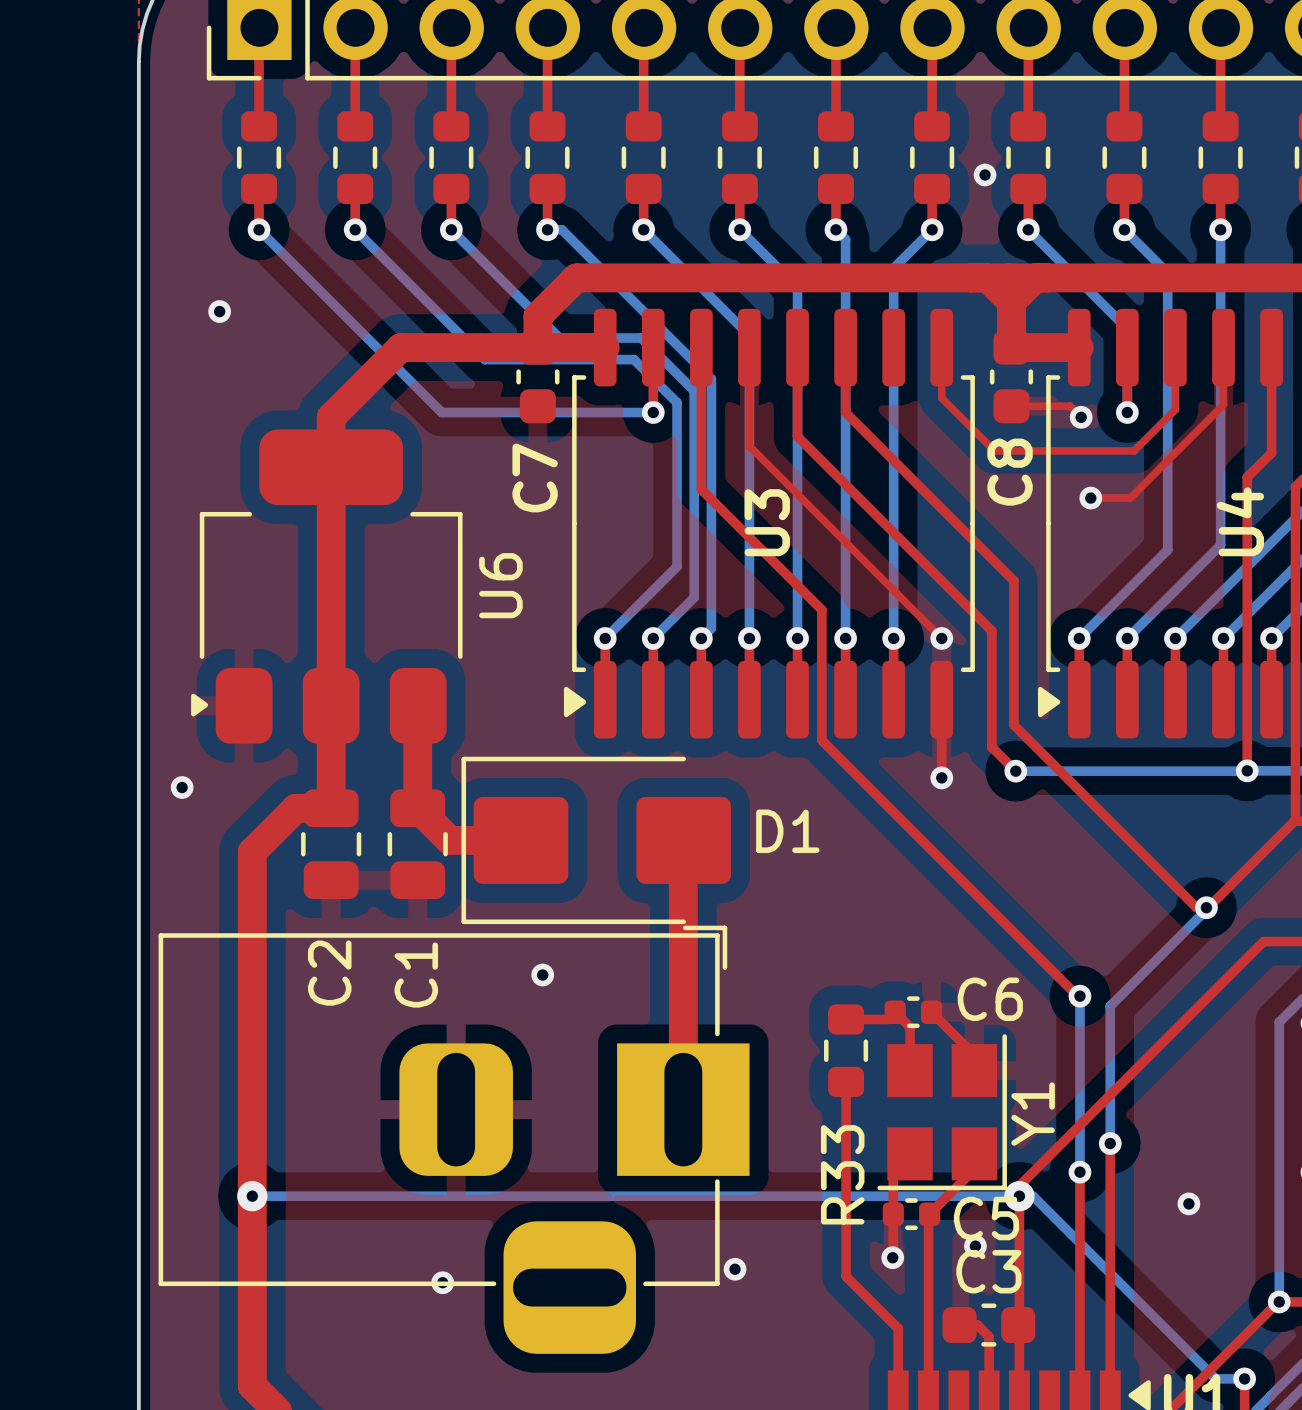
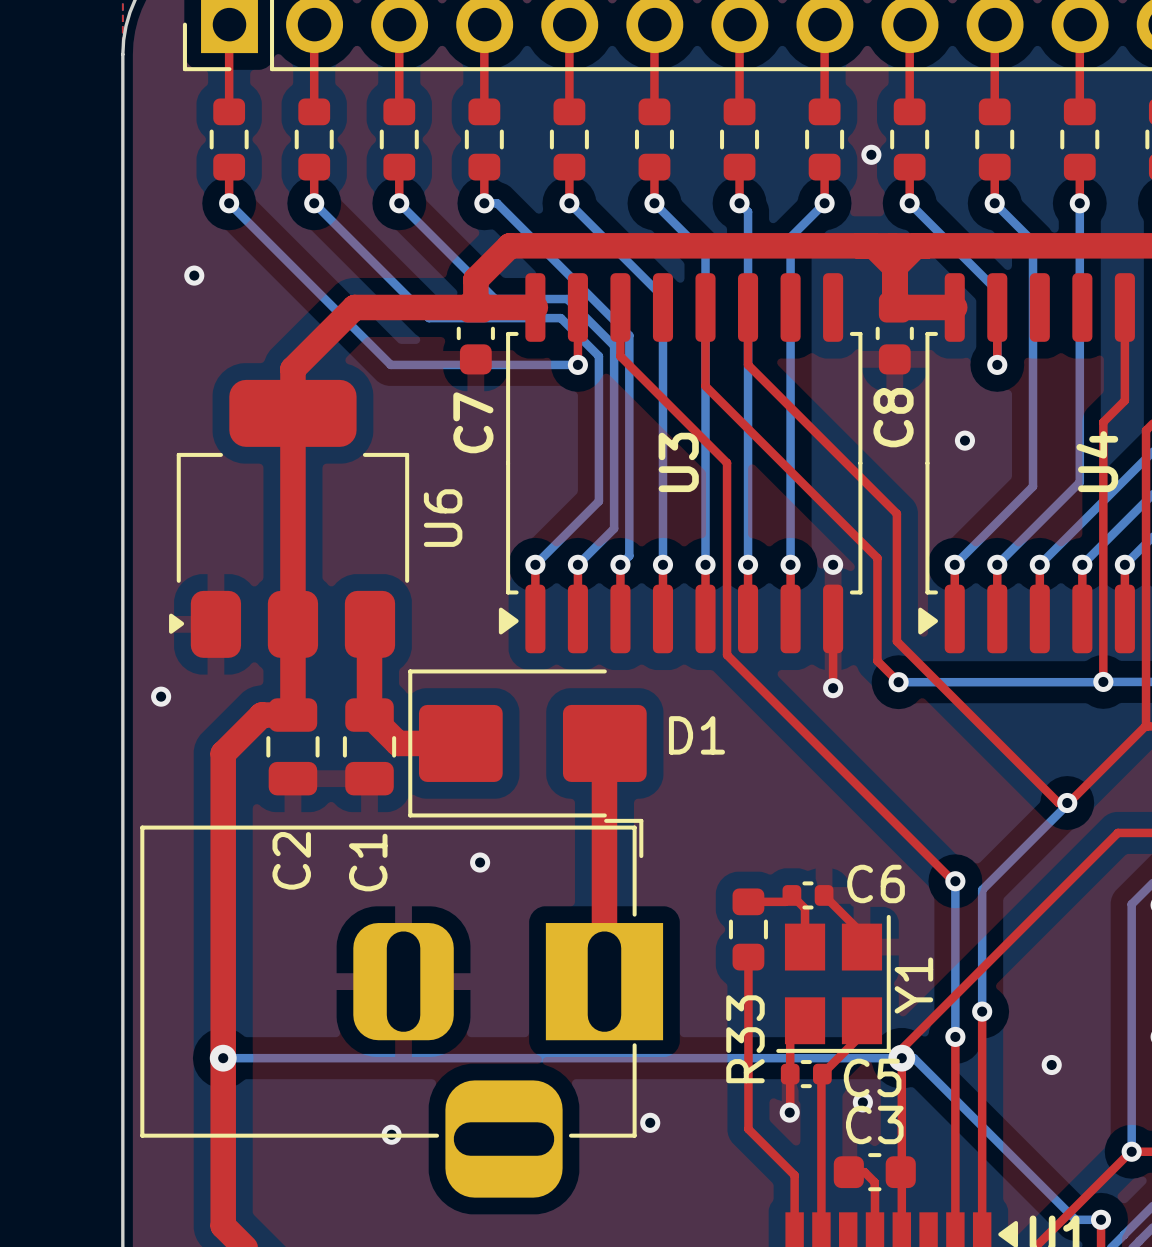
top track: (749, 347) (749, 446) (941, 638) -> none
top track: (941, 347) (941, 398) (994, 450) (1134, 450) (1175, 409) (1175, 347) -> none
top track: (1223, 347) (1223, 404) (1130, 498) (1090, 498) -> none
top track: (701, 402) (701, 489) (821, 609) -> (620, 356) (727, 463) (727, 539)
top track: (1011, 406) (1070, 406) (1081, 417) -> none
via: (1081, 417) -> none

